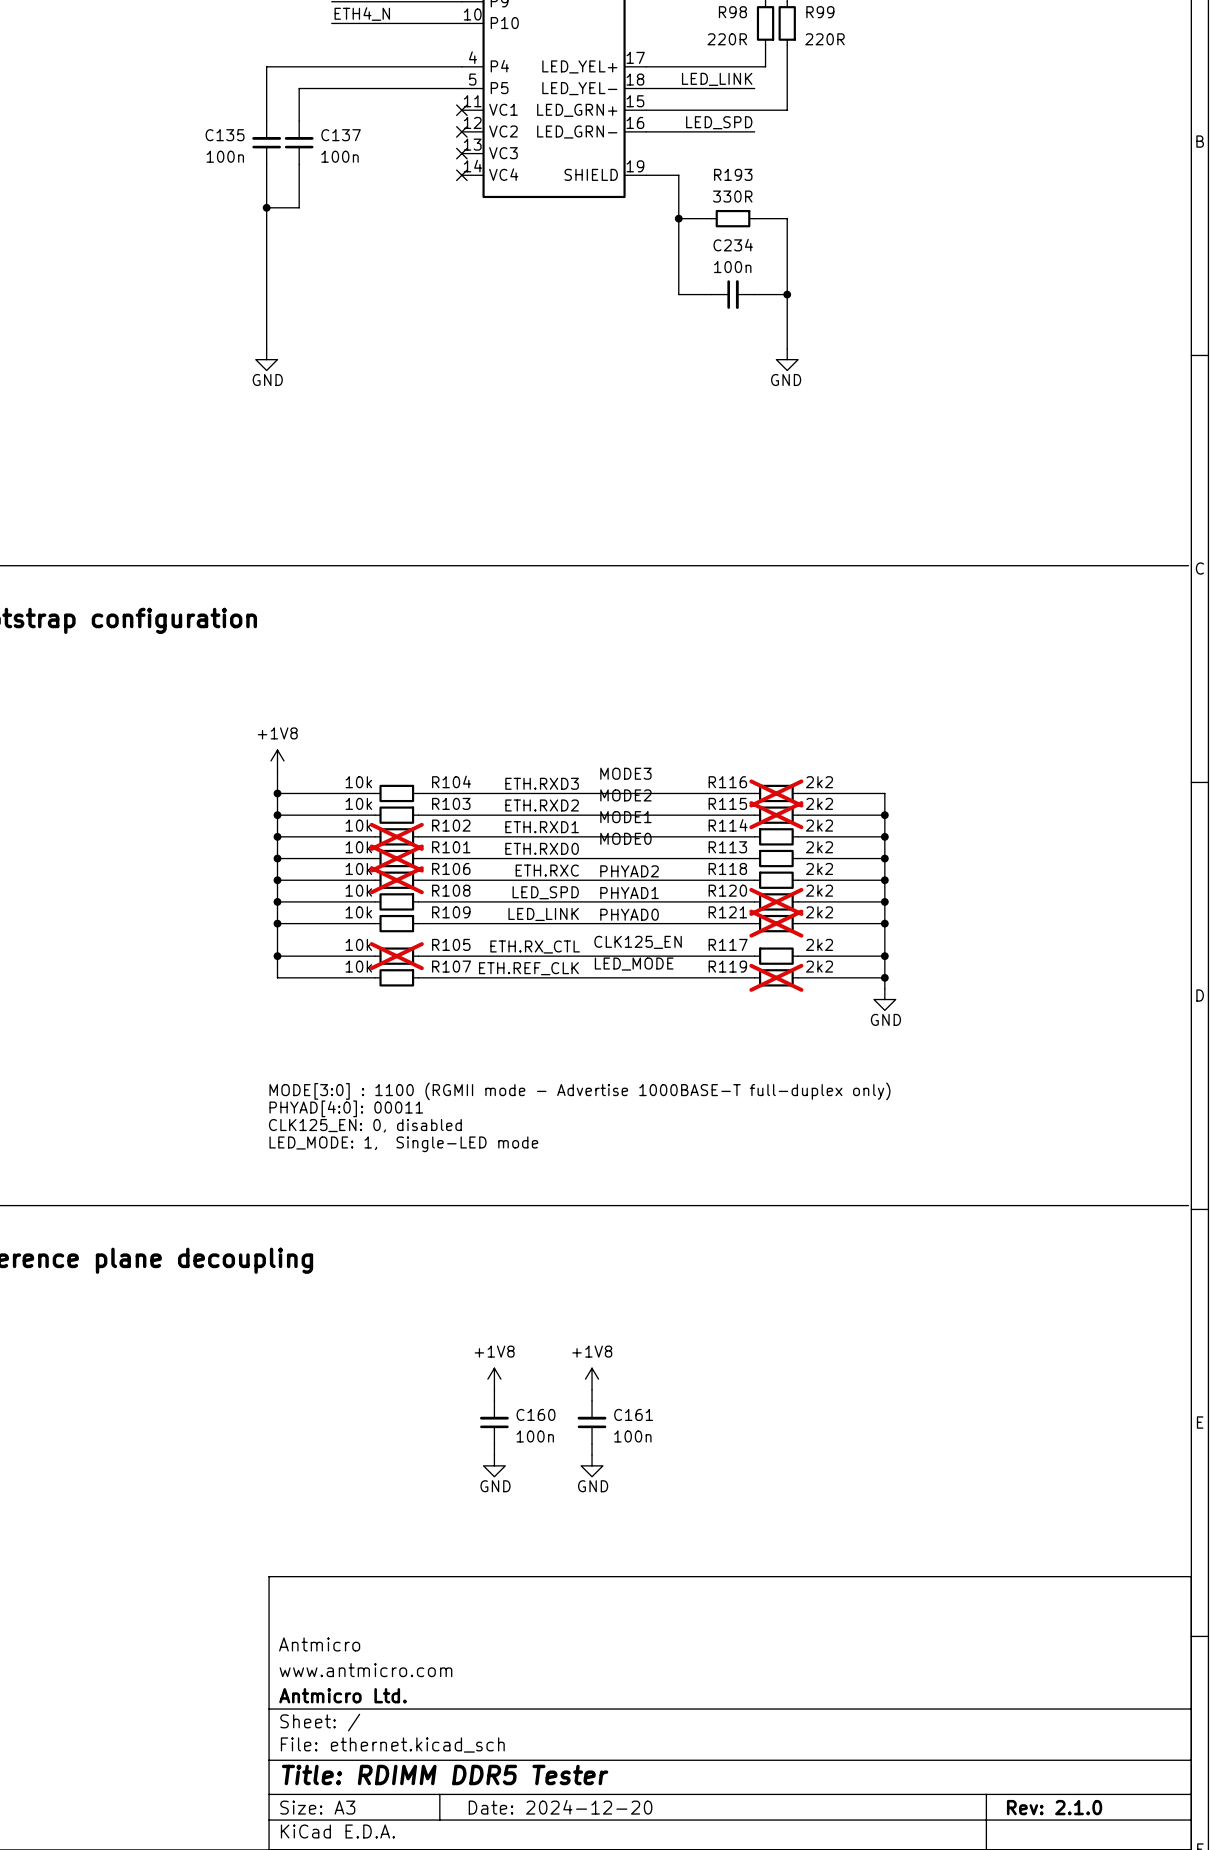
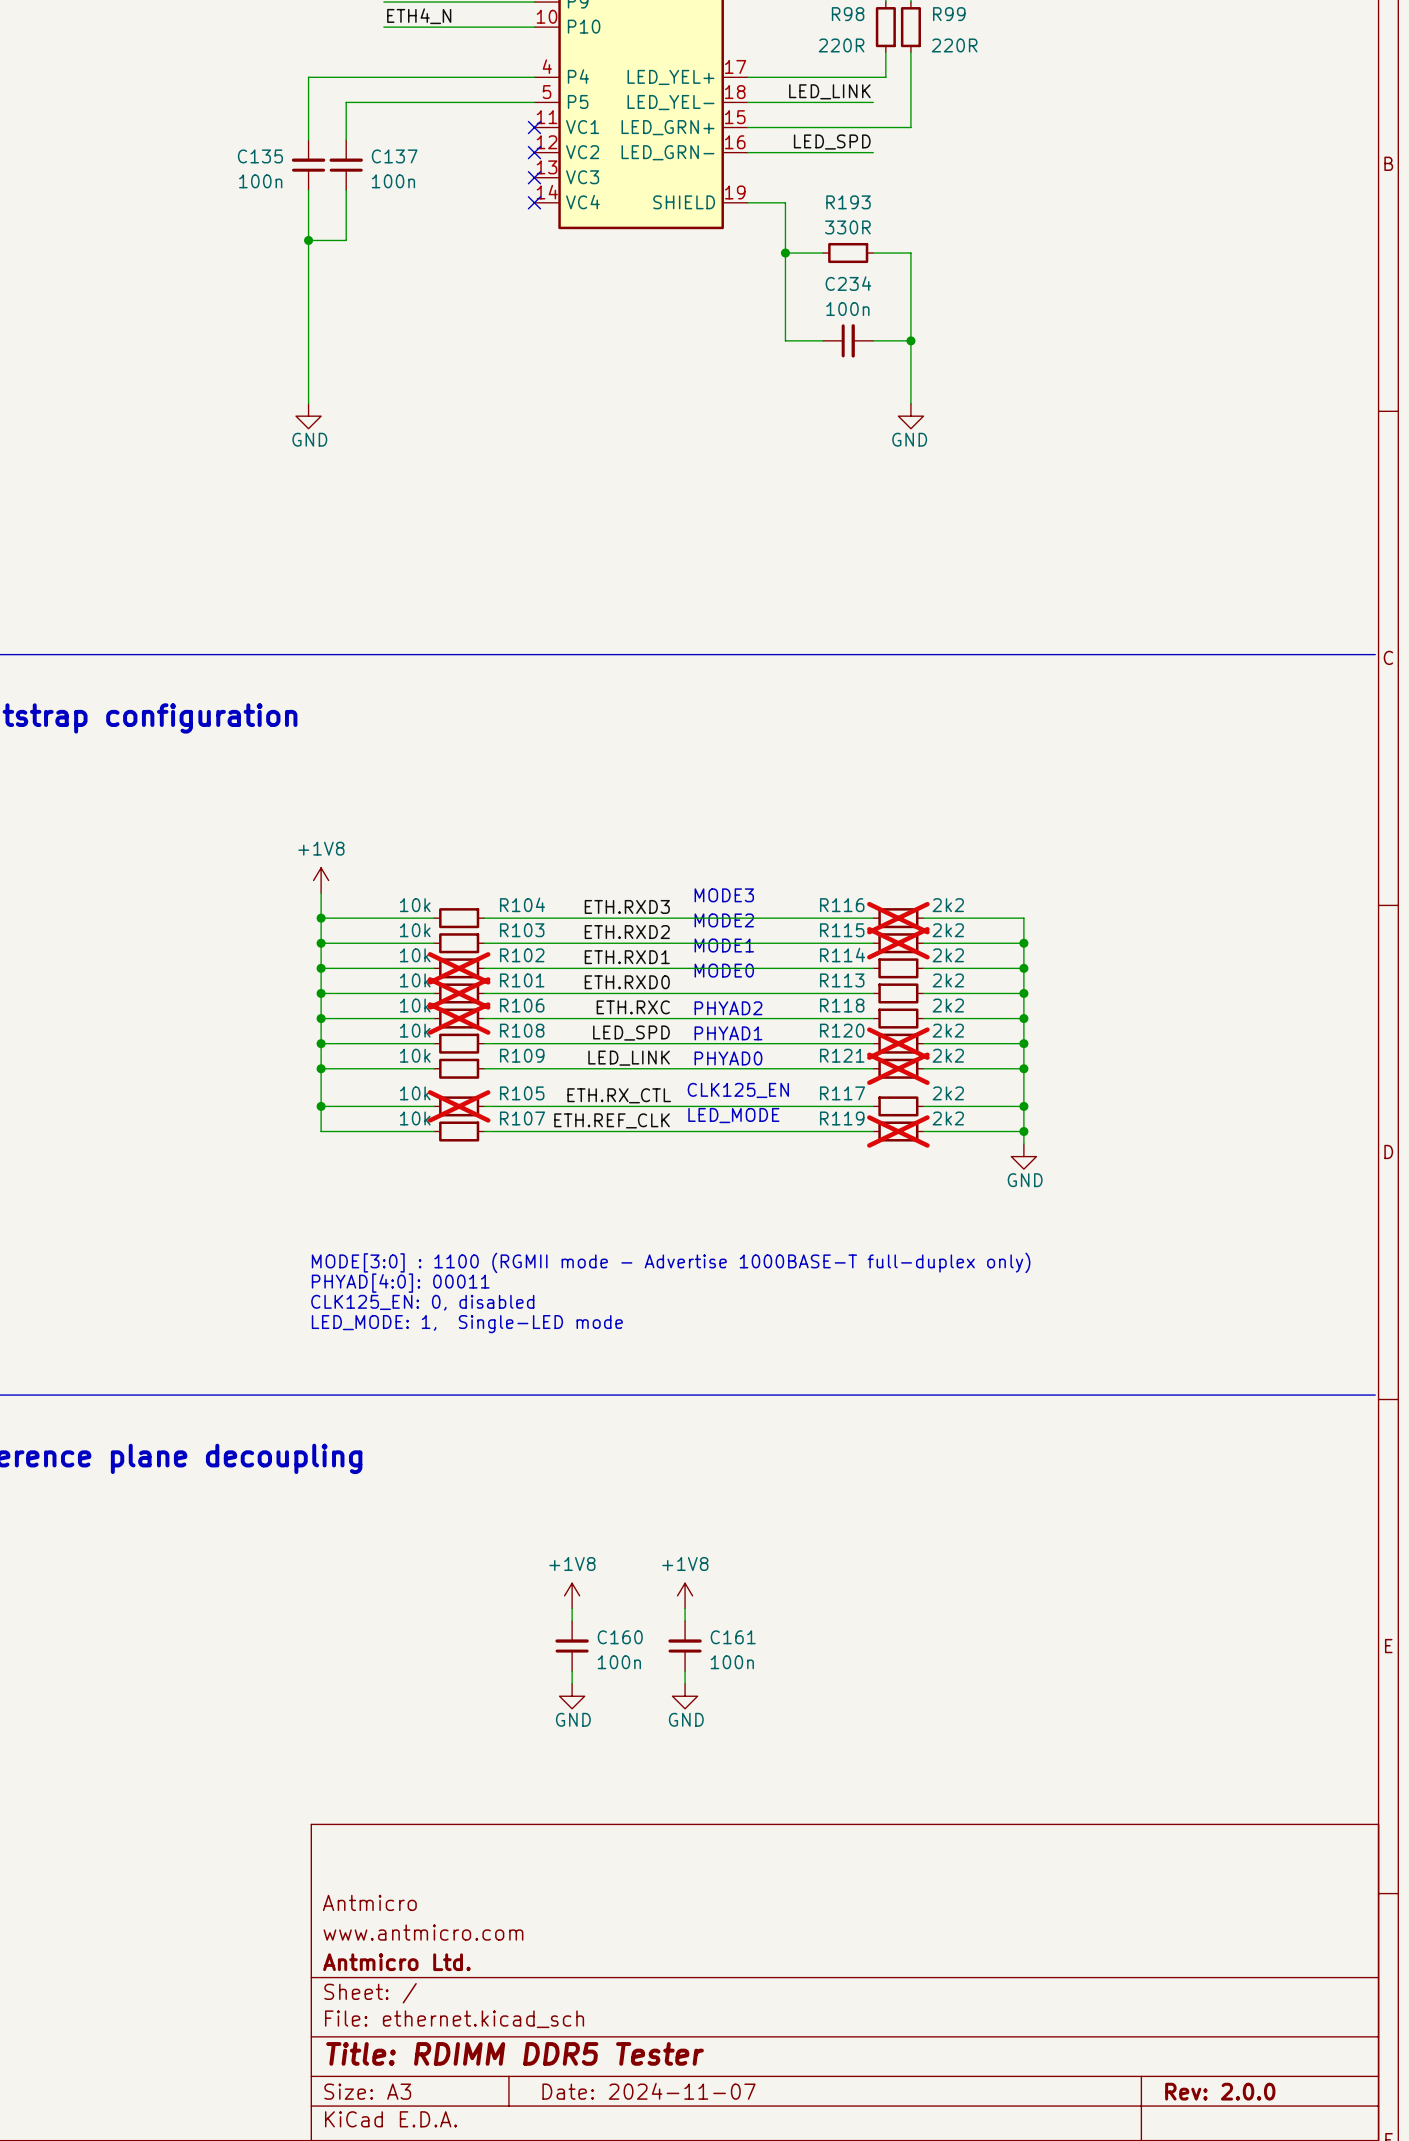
title block: Date: 2024-12-20 (560, 1807) -> Date: 2024-11-07 (649, 2091)
title block: Rev: 2.1.0 (1054, 1807) -> Rev: 2.0.0 (1220, 2091)

